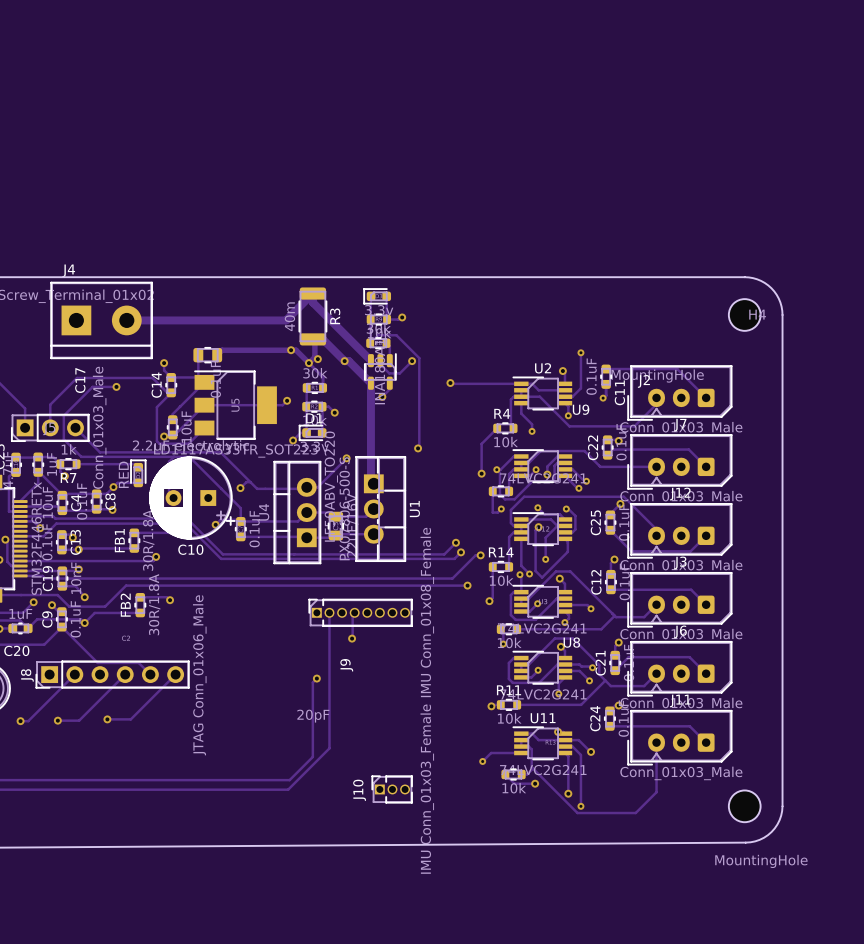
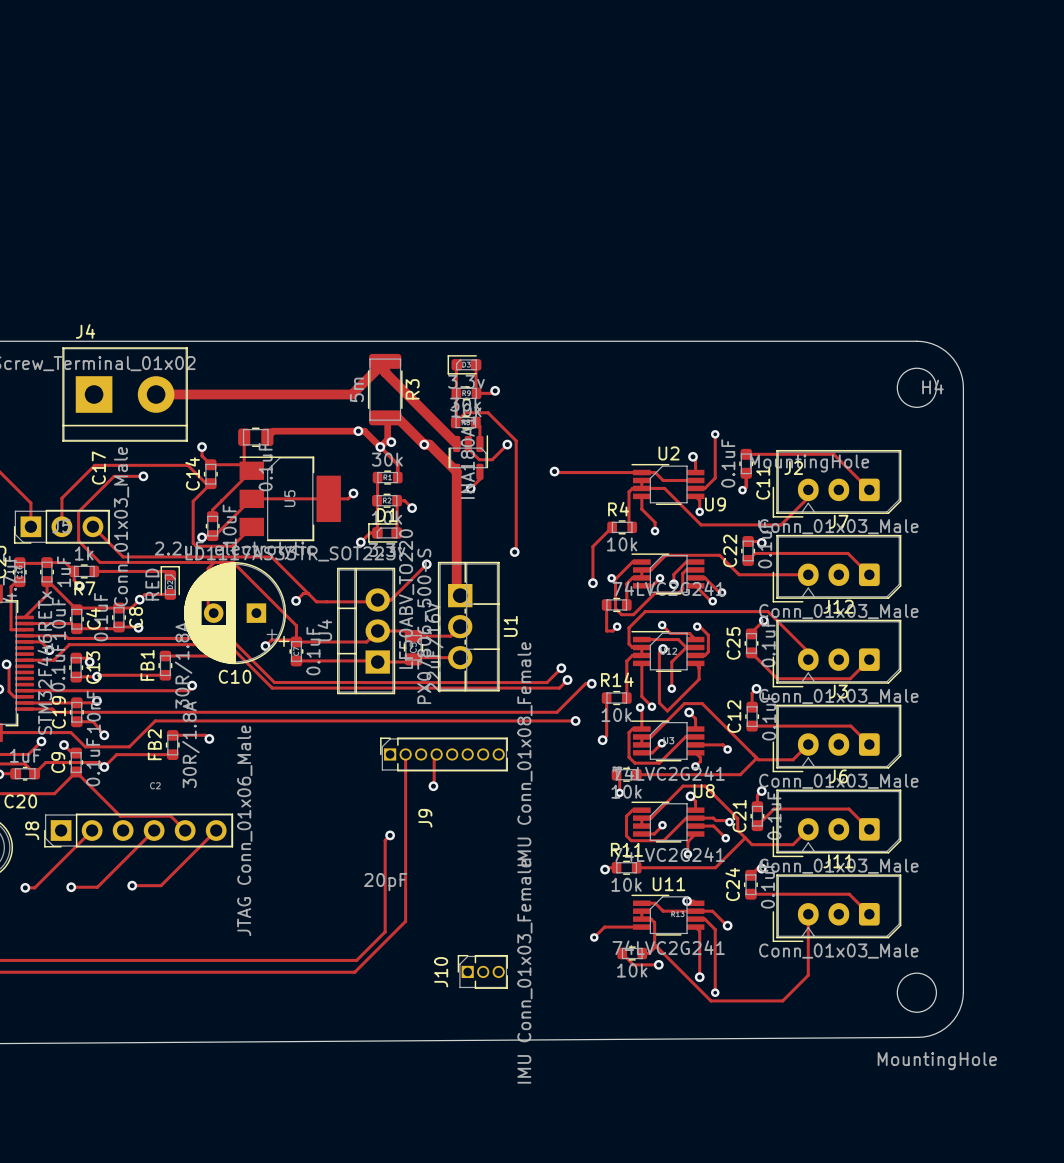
R3 value: 40m (289, 316) -> 5m (356, 389)

